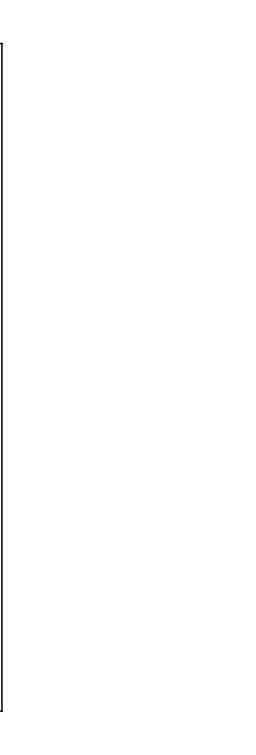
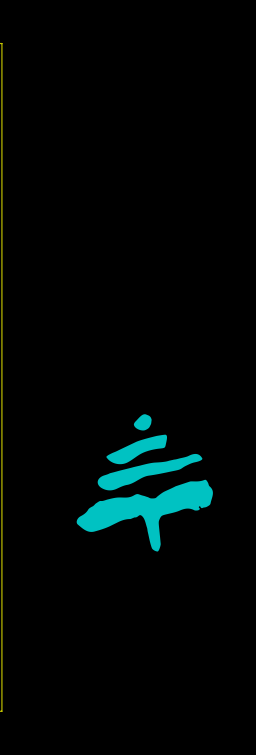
drawing: none -> [76, 414, 213, 552]

